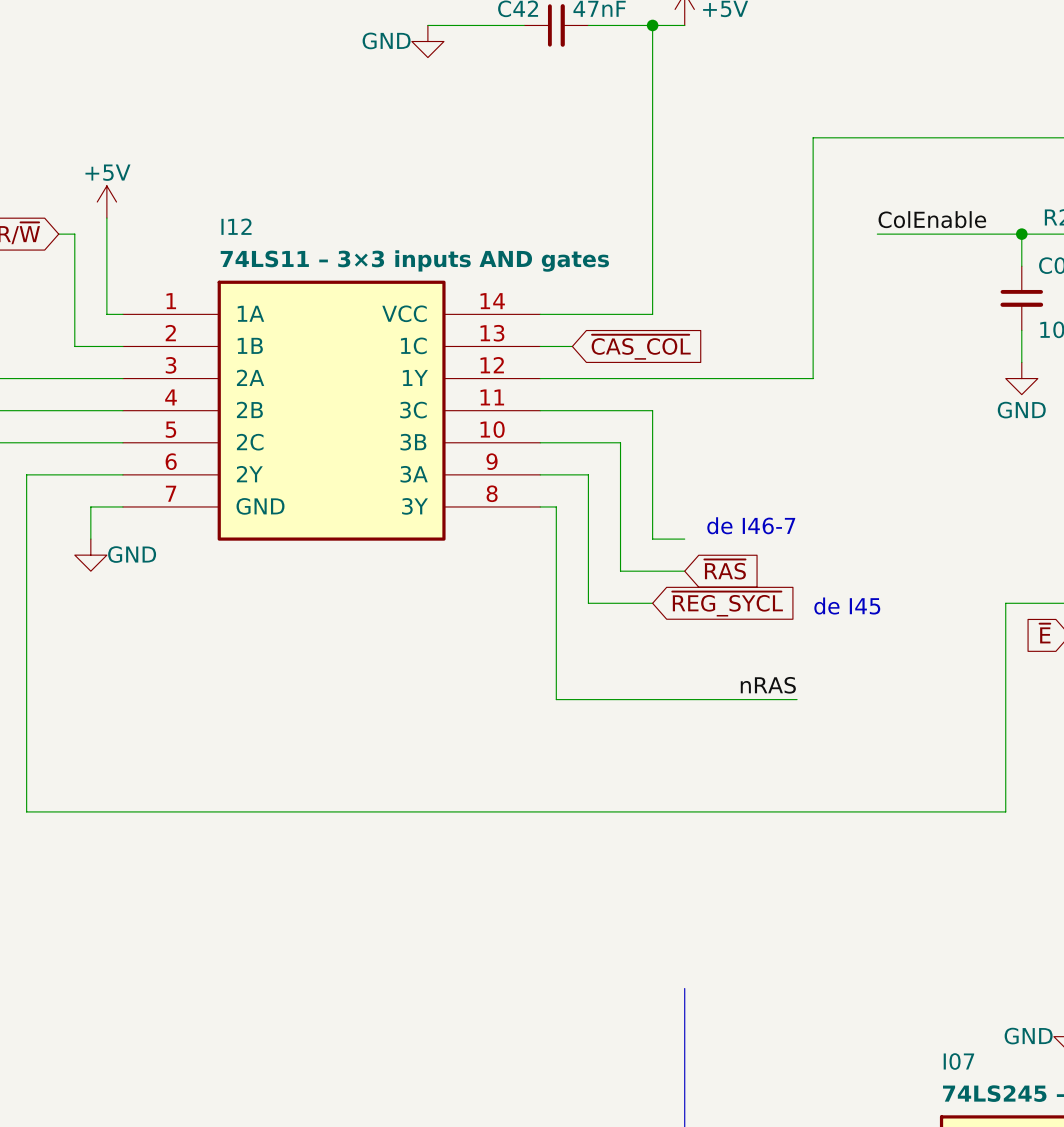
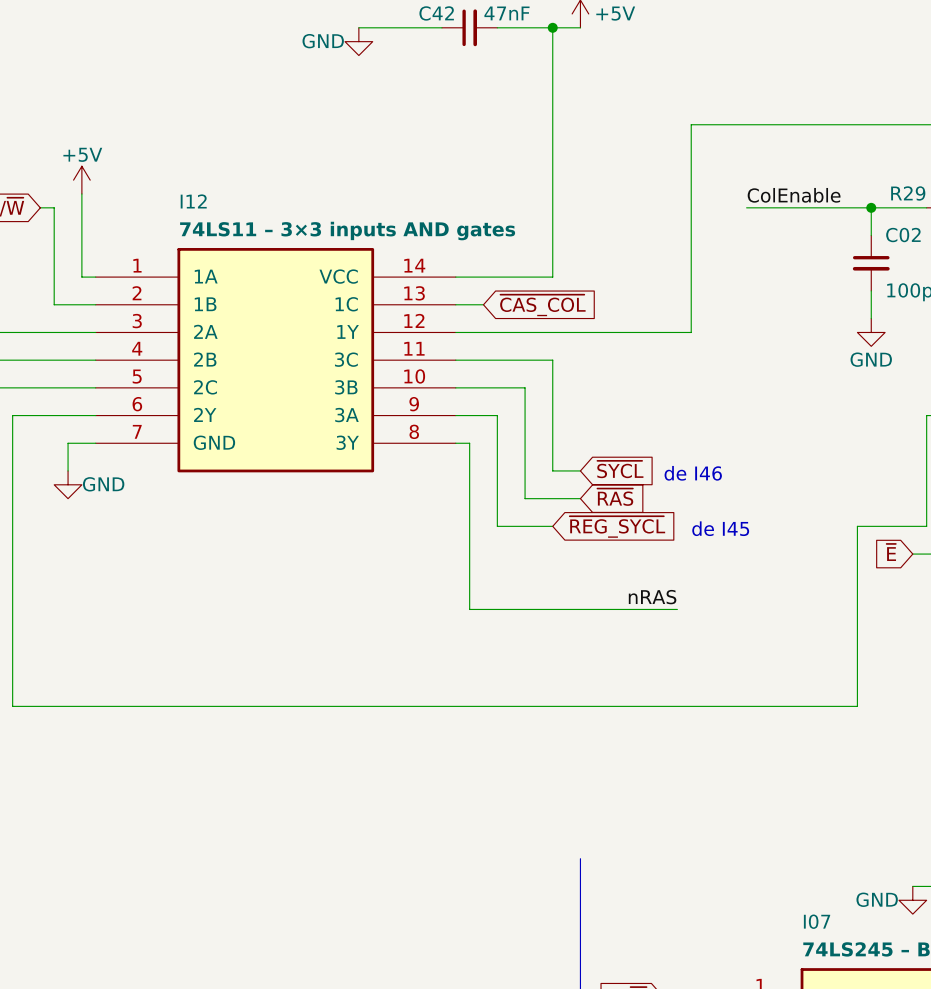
text: de I46-7 (751, 525) -> de I46 (693, 473)
global label: none -> ~{SYCL} (620, 469)

